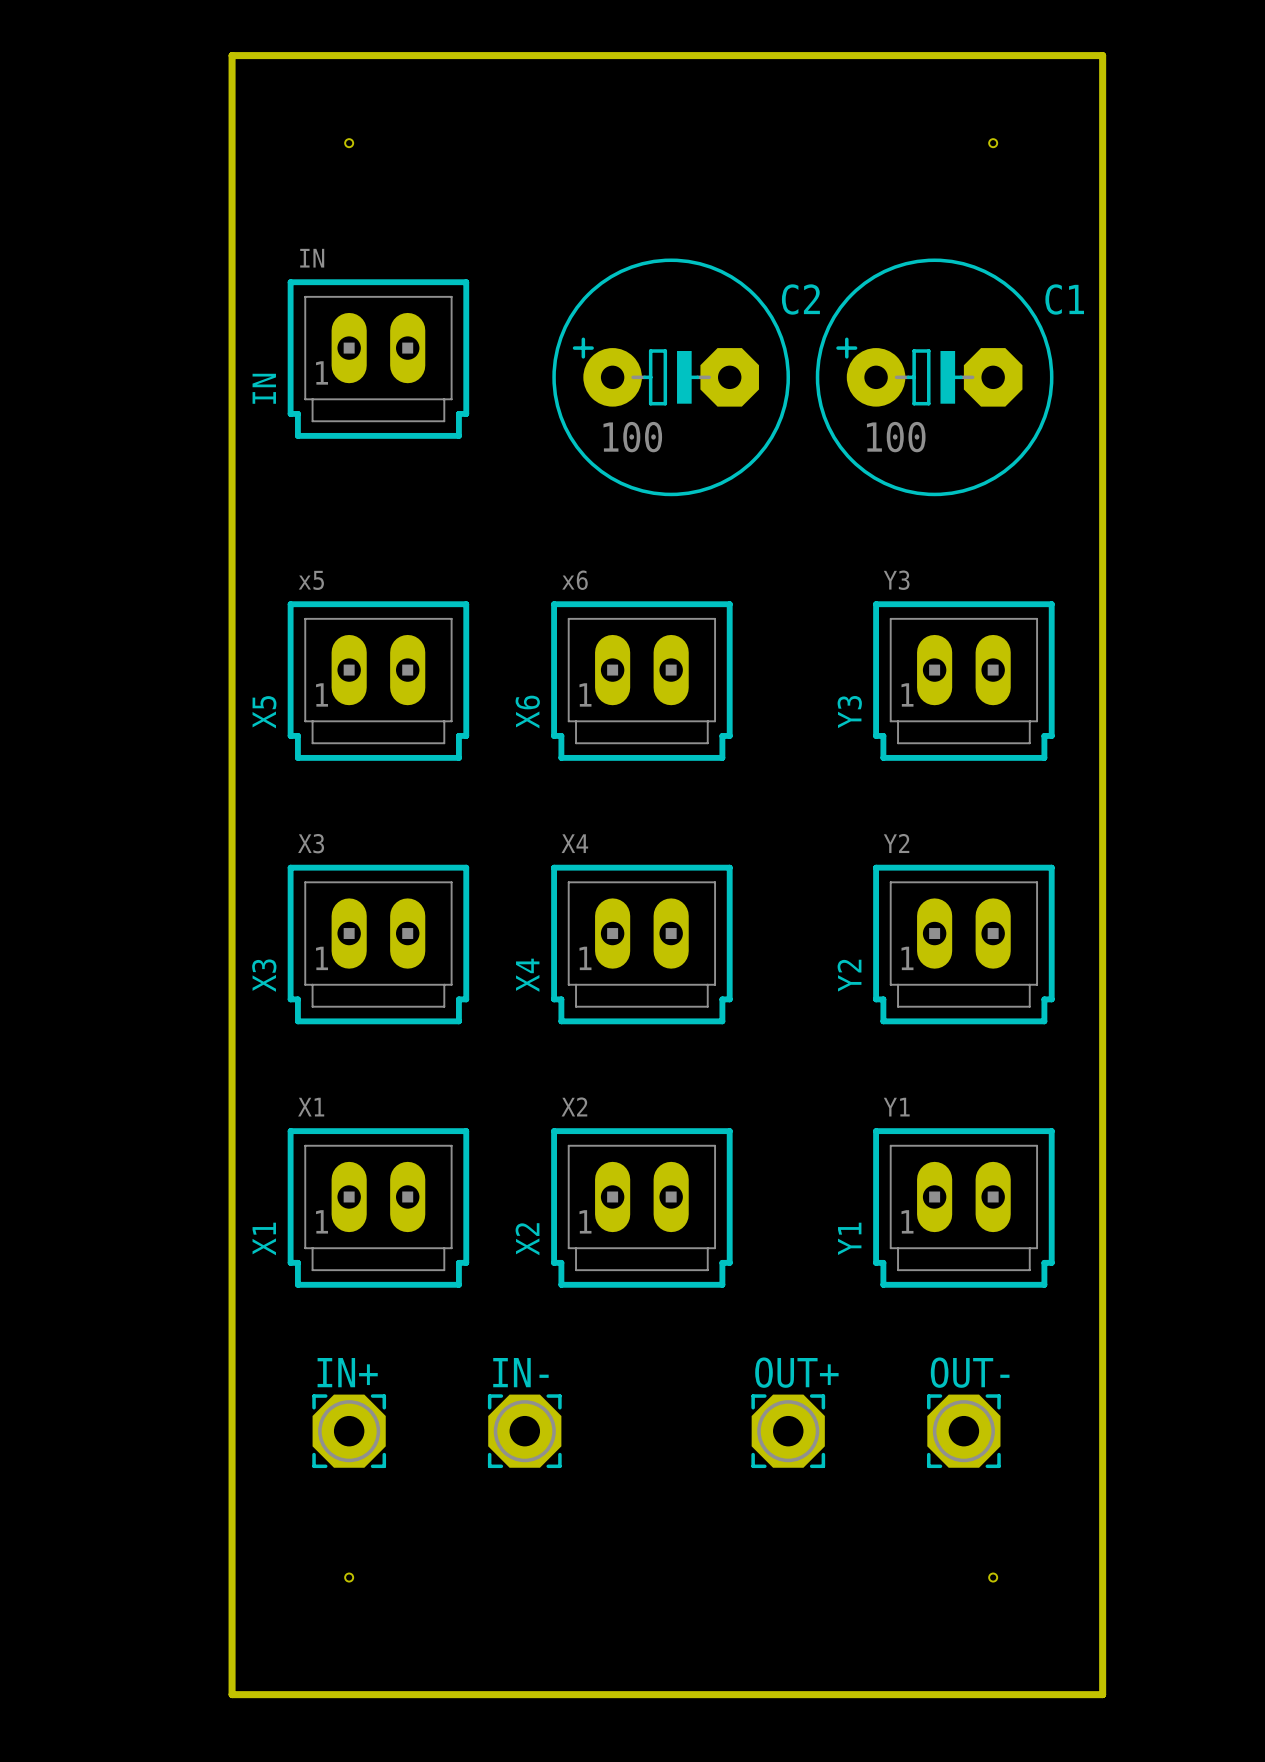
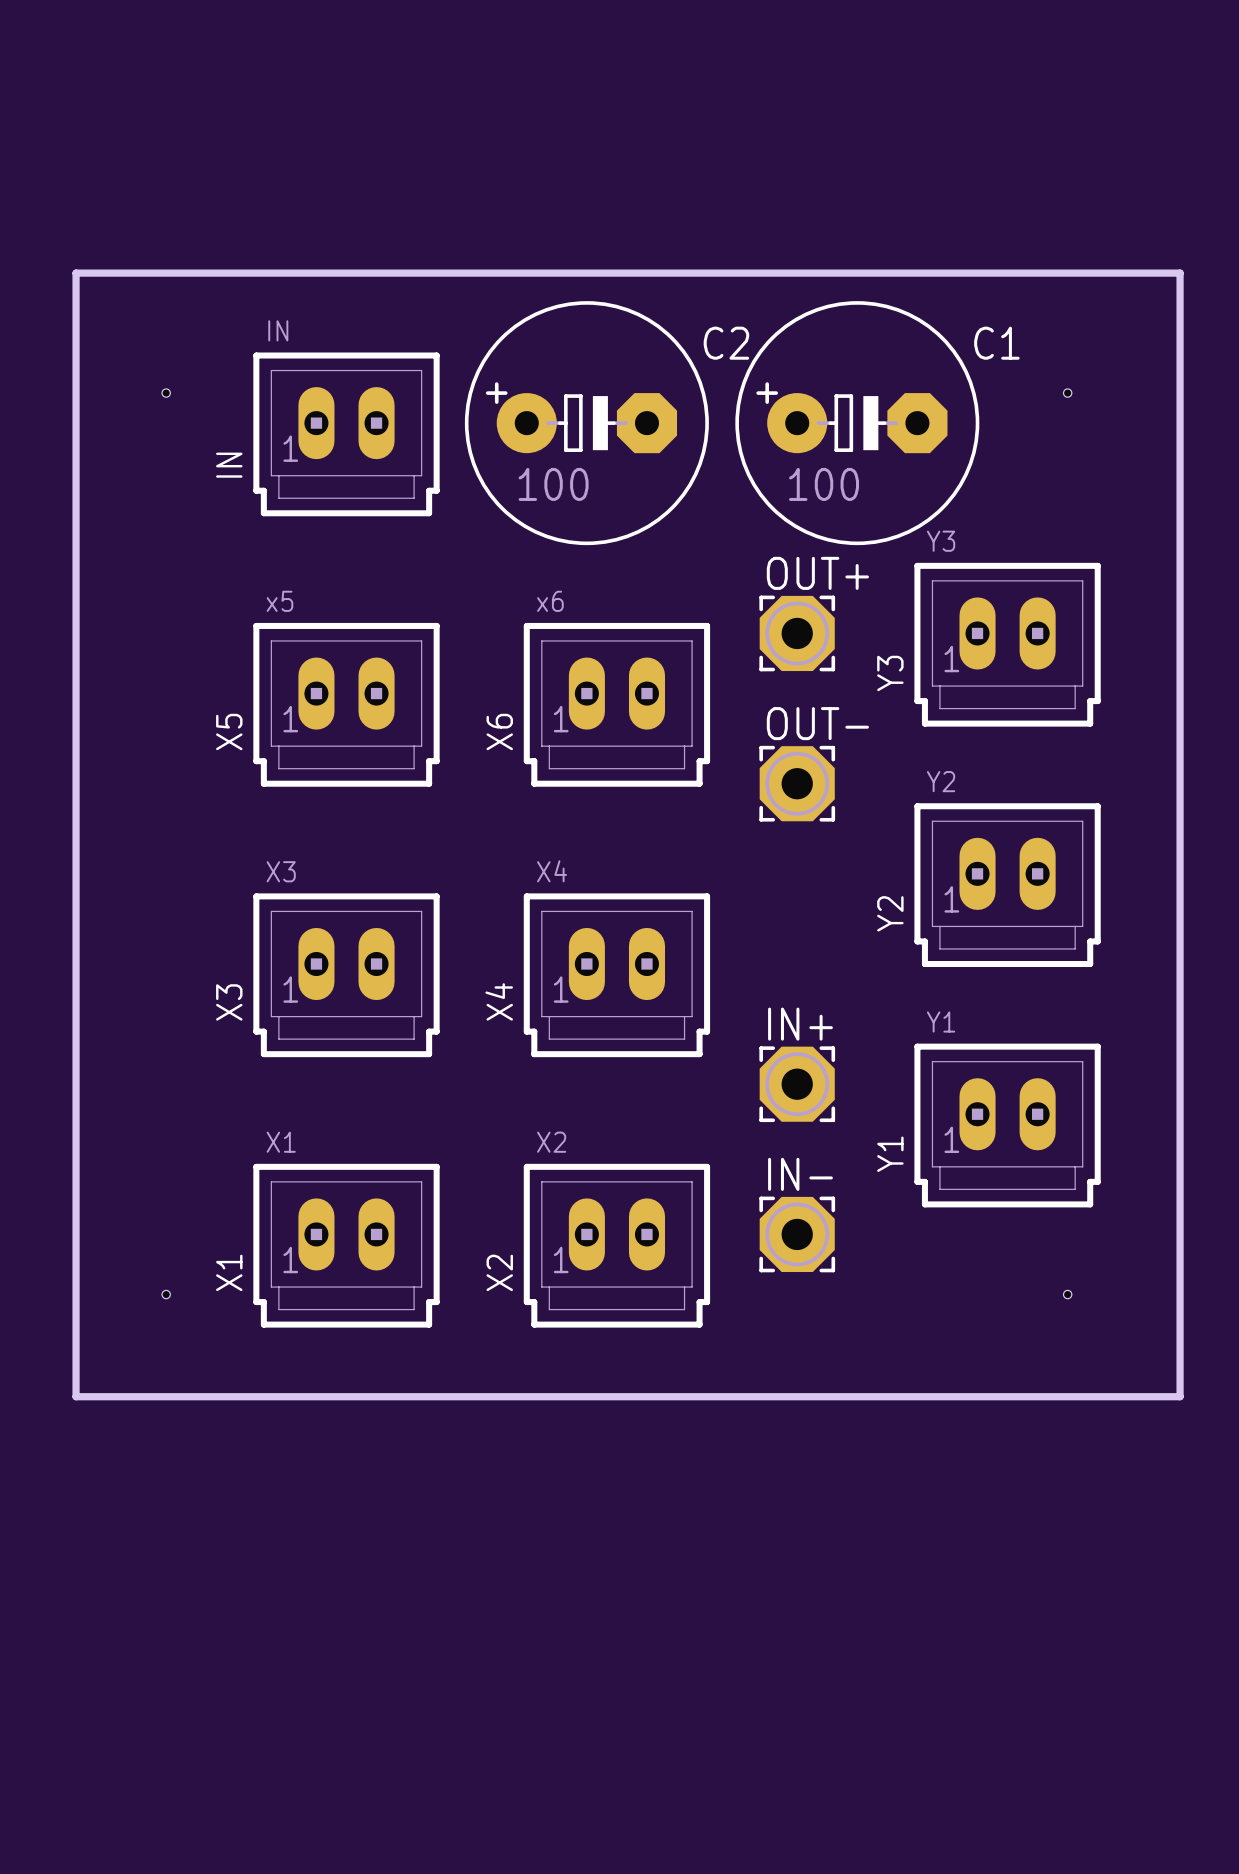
board edge: (232, 55) (1102, 55) (1102, 1694) (232, 1694) (232, 55) -> (76, 273) (76, 1396) (1180, 1396) (1180, 273) (76, 273)
hole position: (349, 143) -> (166, 393)
hole position: (993, 143) -> (1067, 393)
IN position: (378, 359) -> (346, 434)
C2 position: (671, 377) -> (586, 423)
C1 position: (934, 377) -> (857, 423)
OUT+: none -> (797, 633)
Y3 position: (963, 681) -> (1007, 644)
OUT-: none -> (797, 783)
Y2 position: (963, 944) -> (1007, 885)
IN+: none -> (797, 1084)
Y1 position: (963, 1207) -> (1007, 1125)
IN+: (349, 1431) -> none
IN- position: (524, 1431) -> (797, 1234)
OUT+: (788, 1431) -> none
OUT-: (963, 1431) -> none
hole position: (349, 1577) -> (166, 1294)
hole position: (993, 1577) -> (1067, 1294)

